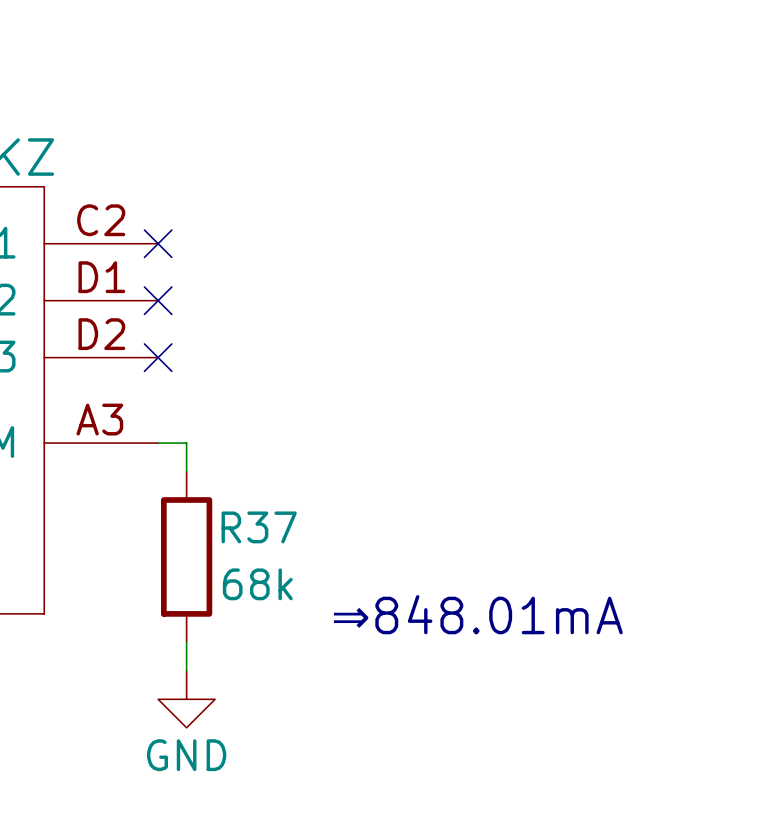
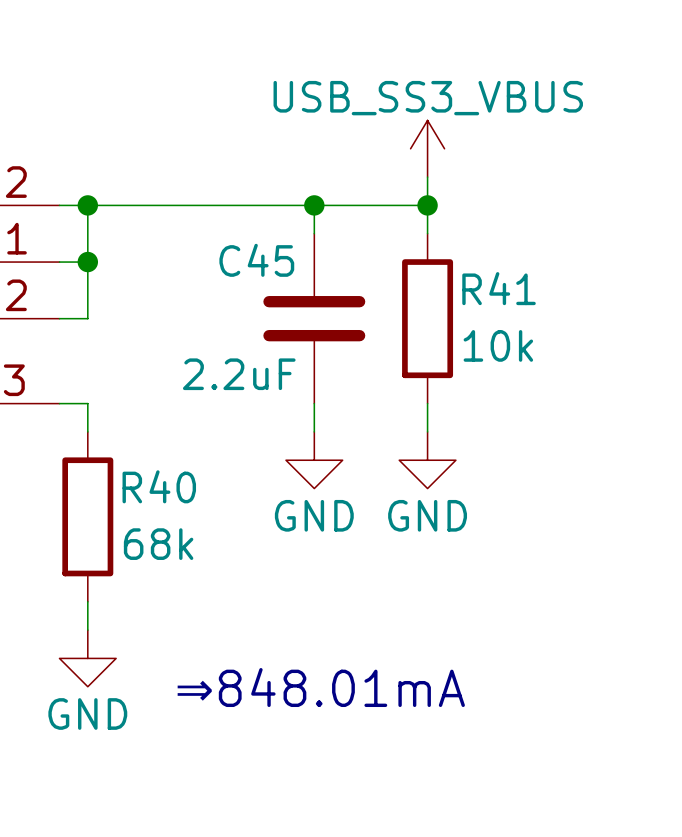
power symbol: none -> USB_SS3_VBUS (427, 148)
wire: none -> (427, 177) (427, 233)
wire: none -> (59, 205) (427, 205)
no-connect mark: (158, 243) -> none
wire: none -> (87, 205) (87, 318) (59, 318)
junction: none -> (87, 205)
wire: none -> (314, 205) (314, 233)
junction: none -> (314, 205)
junction: none -> (427, 205)
wire: none -> (59, 262) (87, 262)
no-connect mark: (158, 300) -> none
junction: none -> (87, 262)
no-connect mark: (158, 357) -> none
C45: none -> 2.2uF (314, 318)
R41: none -> 10k (427, 318)
wire: none -> (314, 403) (314, 431)
wire: none -> (427, 403) (427, 431)
power symbol: none -> GND (314, 460)
power symbol: none -> GND (427, 460)
R37 name: R37 (259, 527) -> R40 (159, 486)
text position: ⇒848.01mA (477, 614) -> ⇒848.01mA (320, 687)

